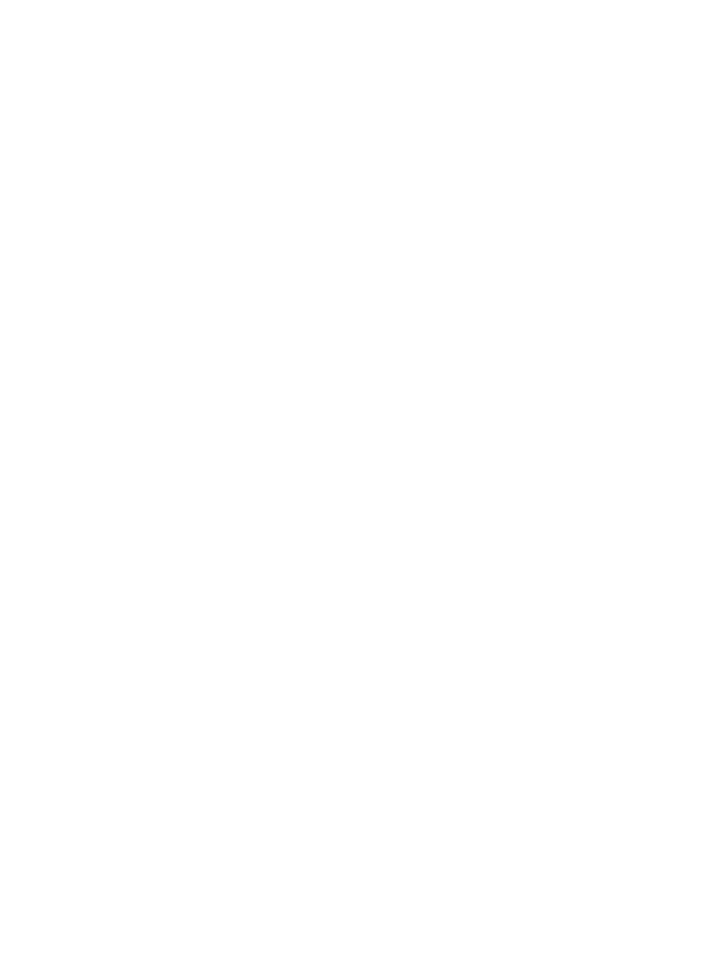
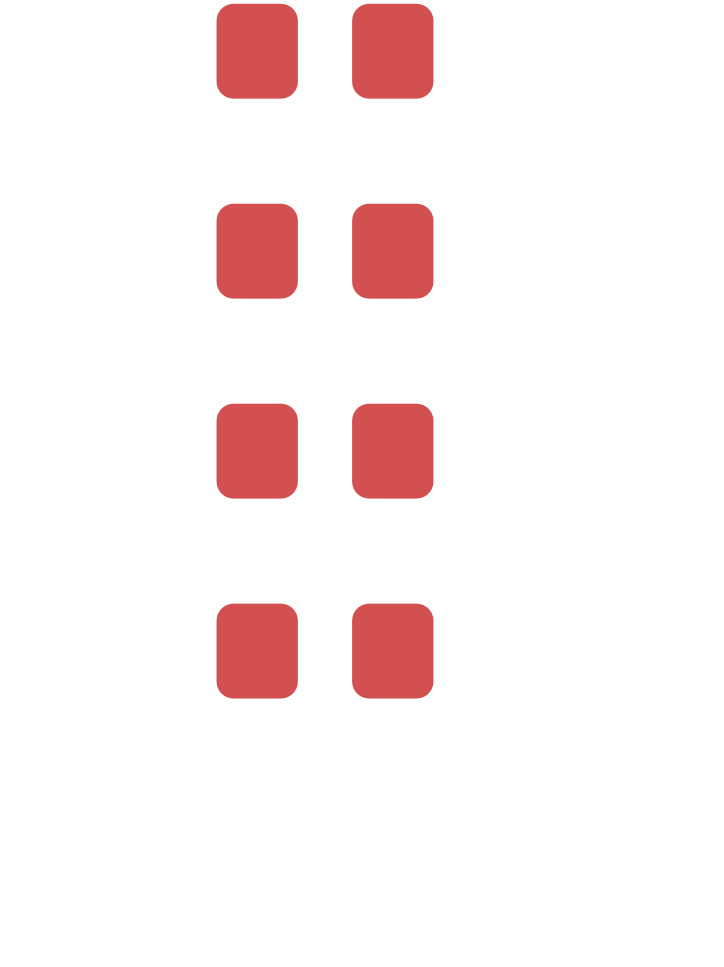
part: none -> (324, 51)
part: none -> (324, 251)
part: none -> (324, 451)
part: none -> (324, 651)

